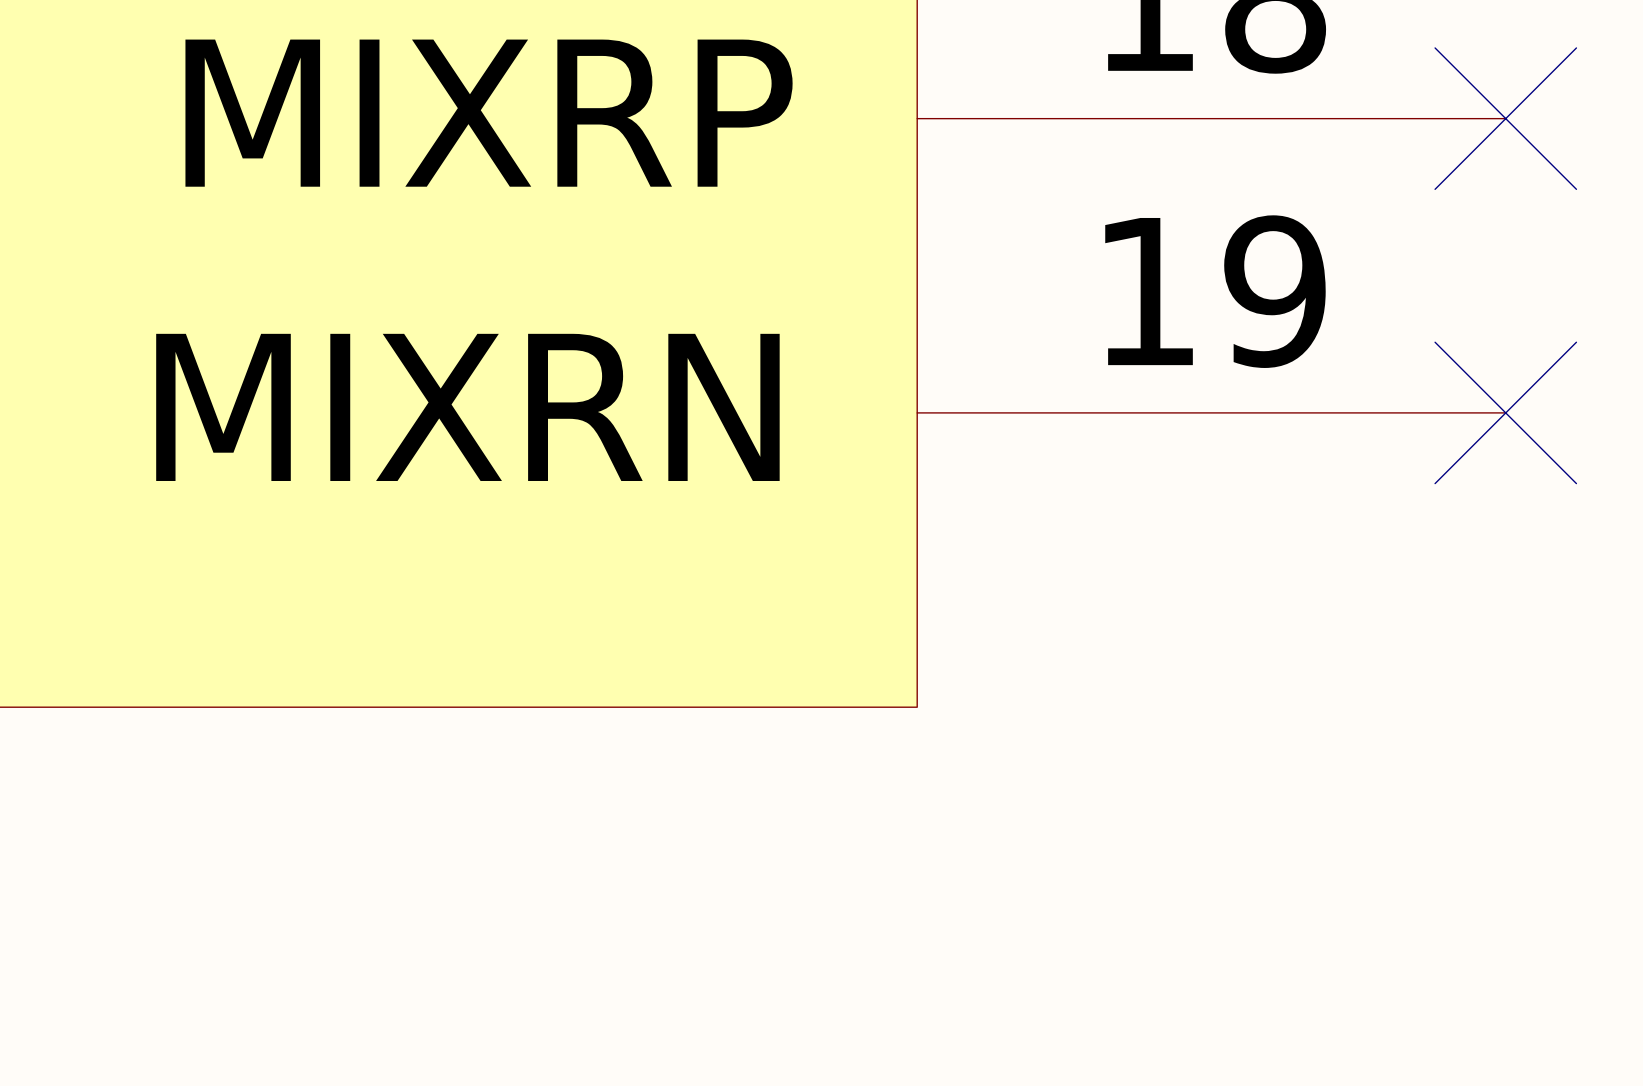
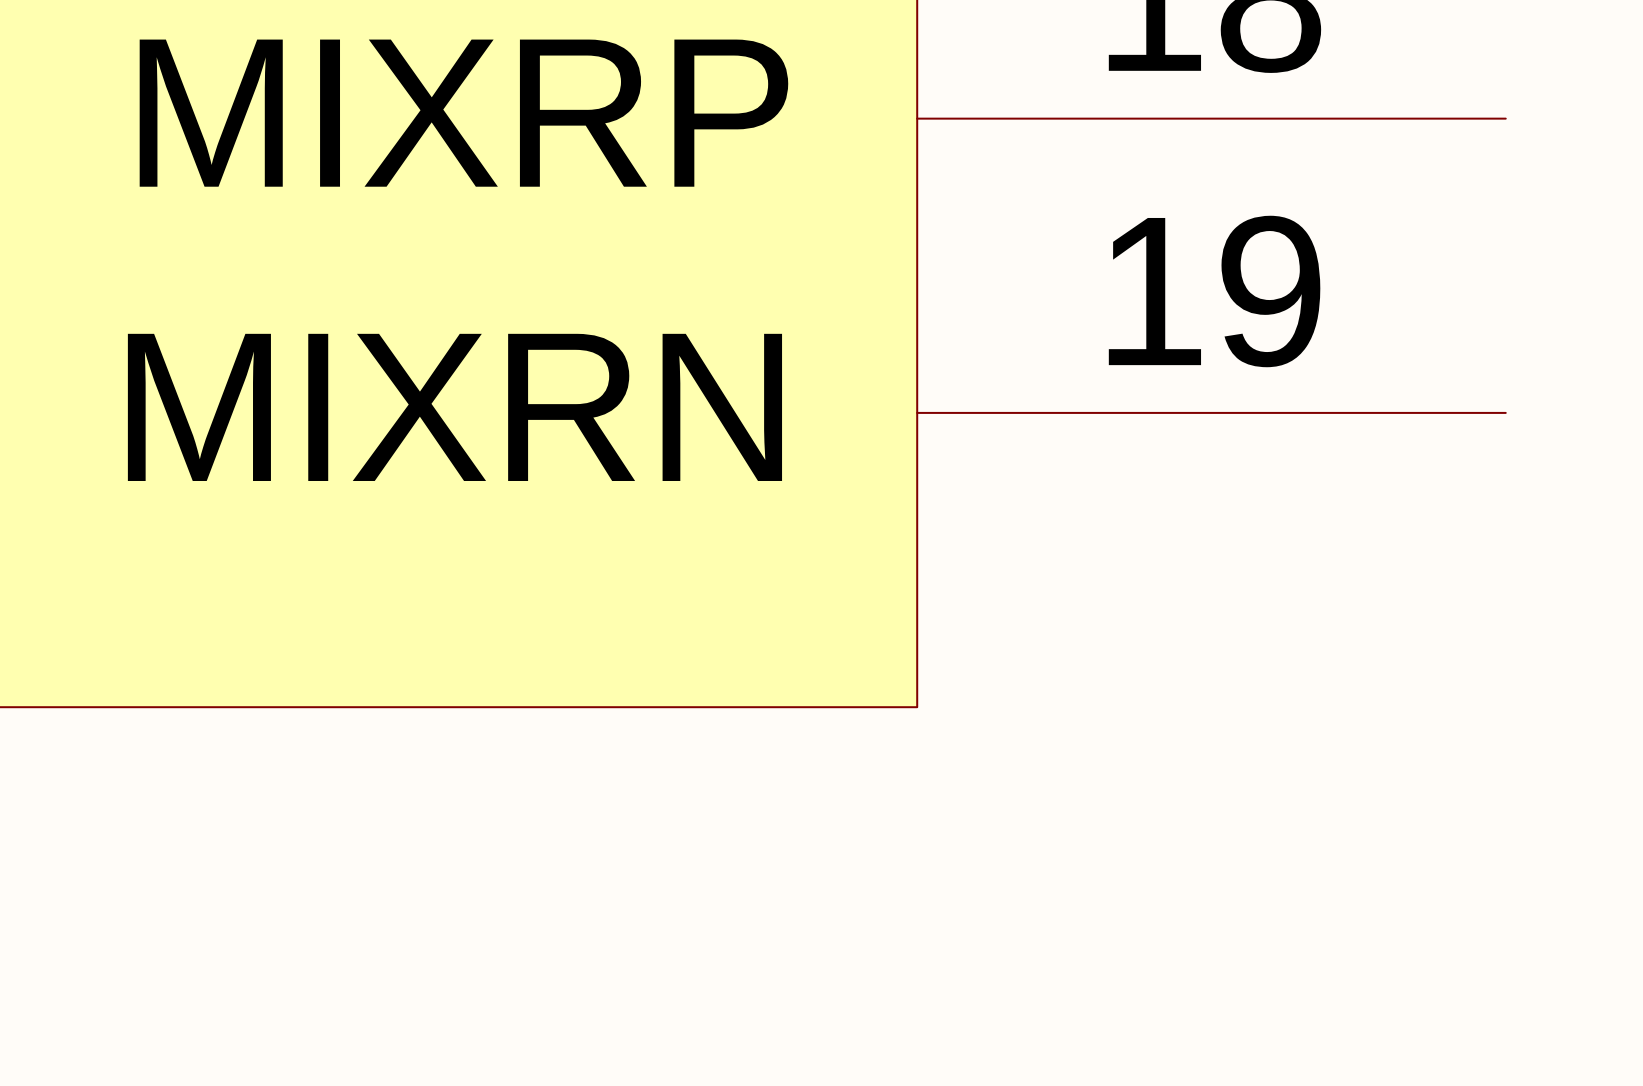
no-connect mark: (1505, 118) -> none
no-connect mark: (1505, 412) -> none

